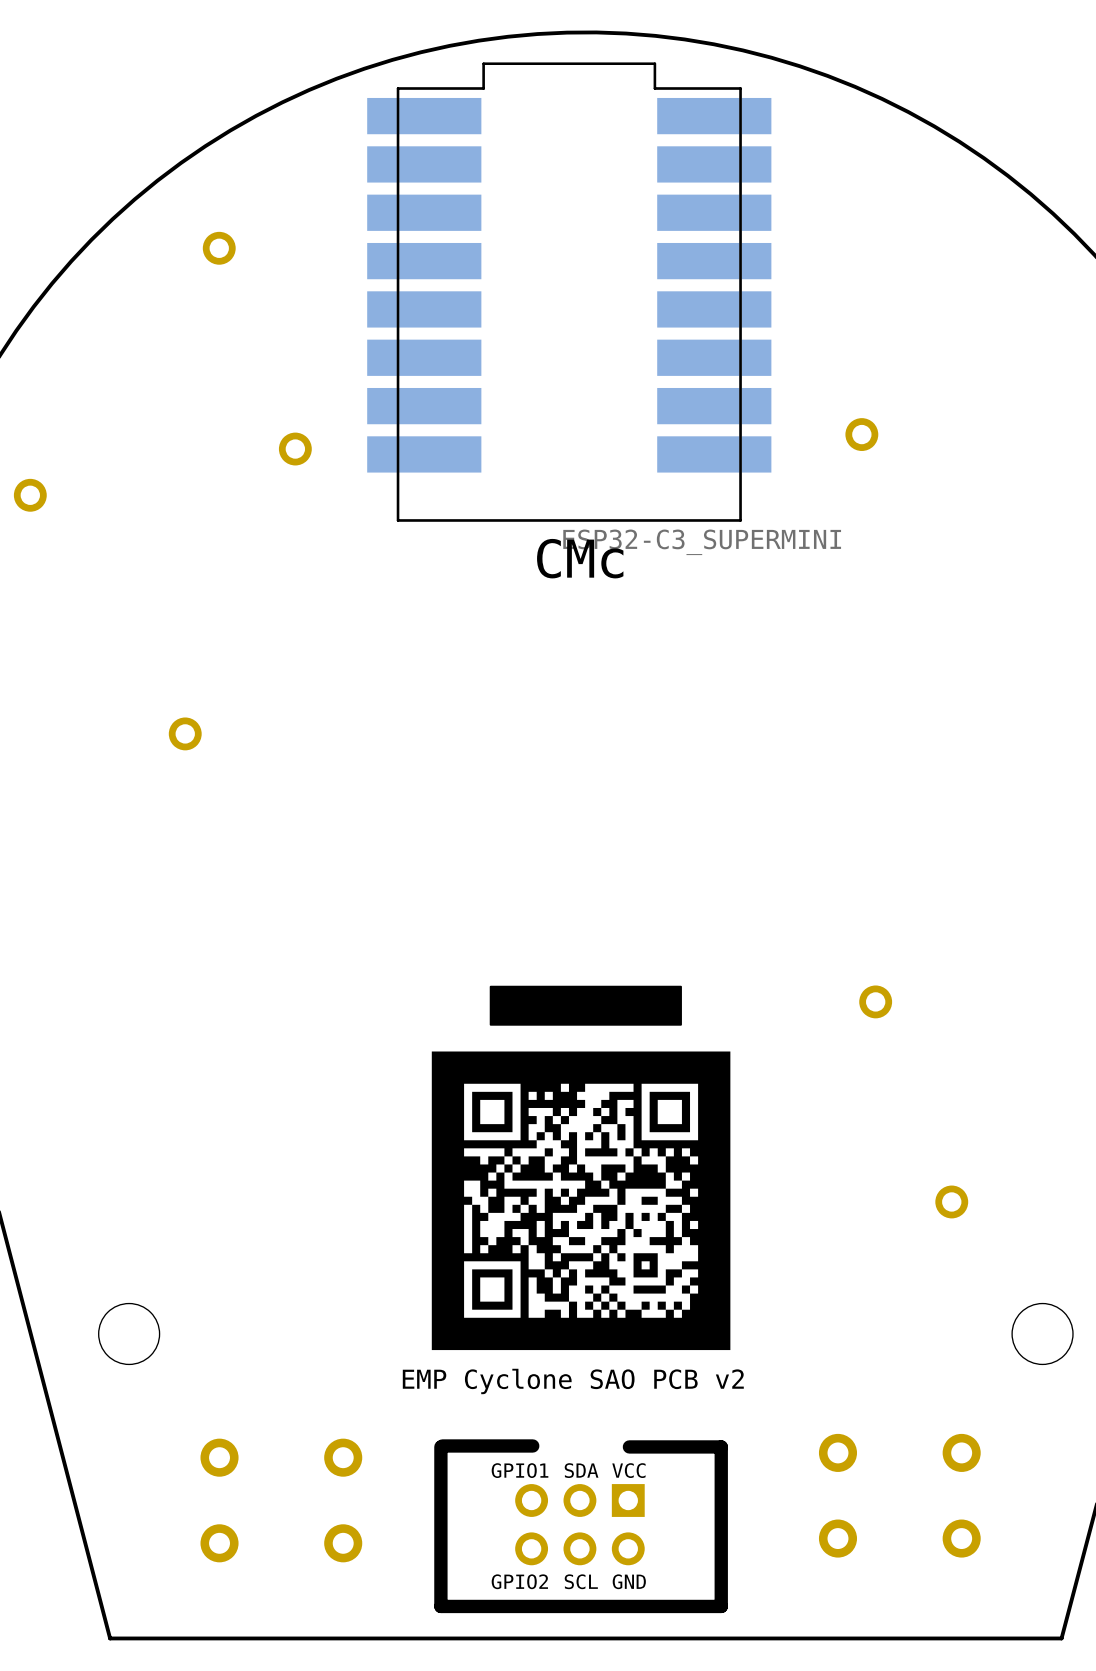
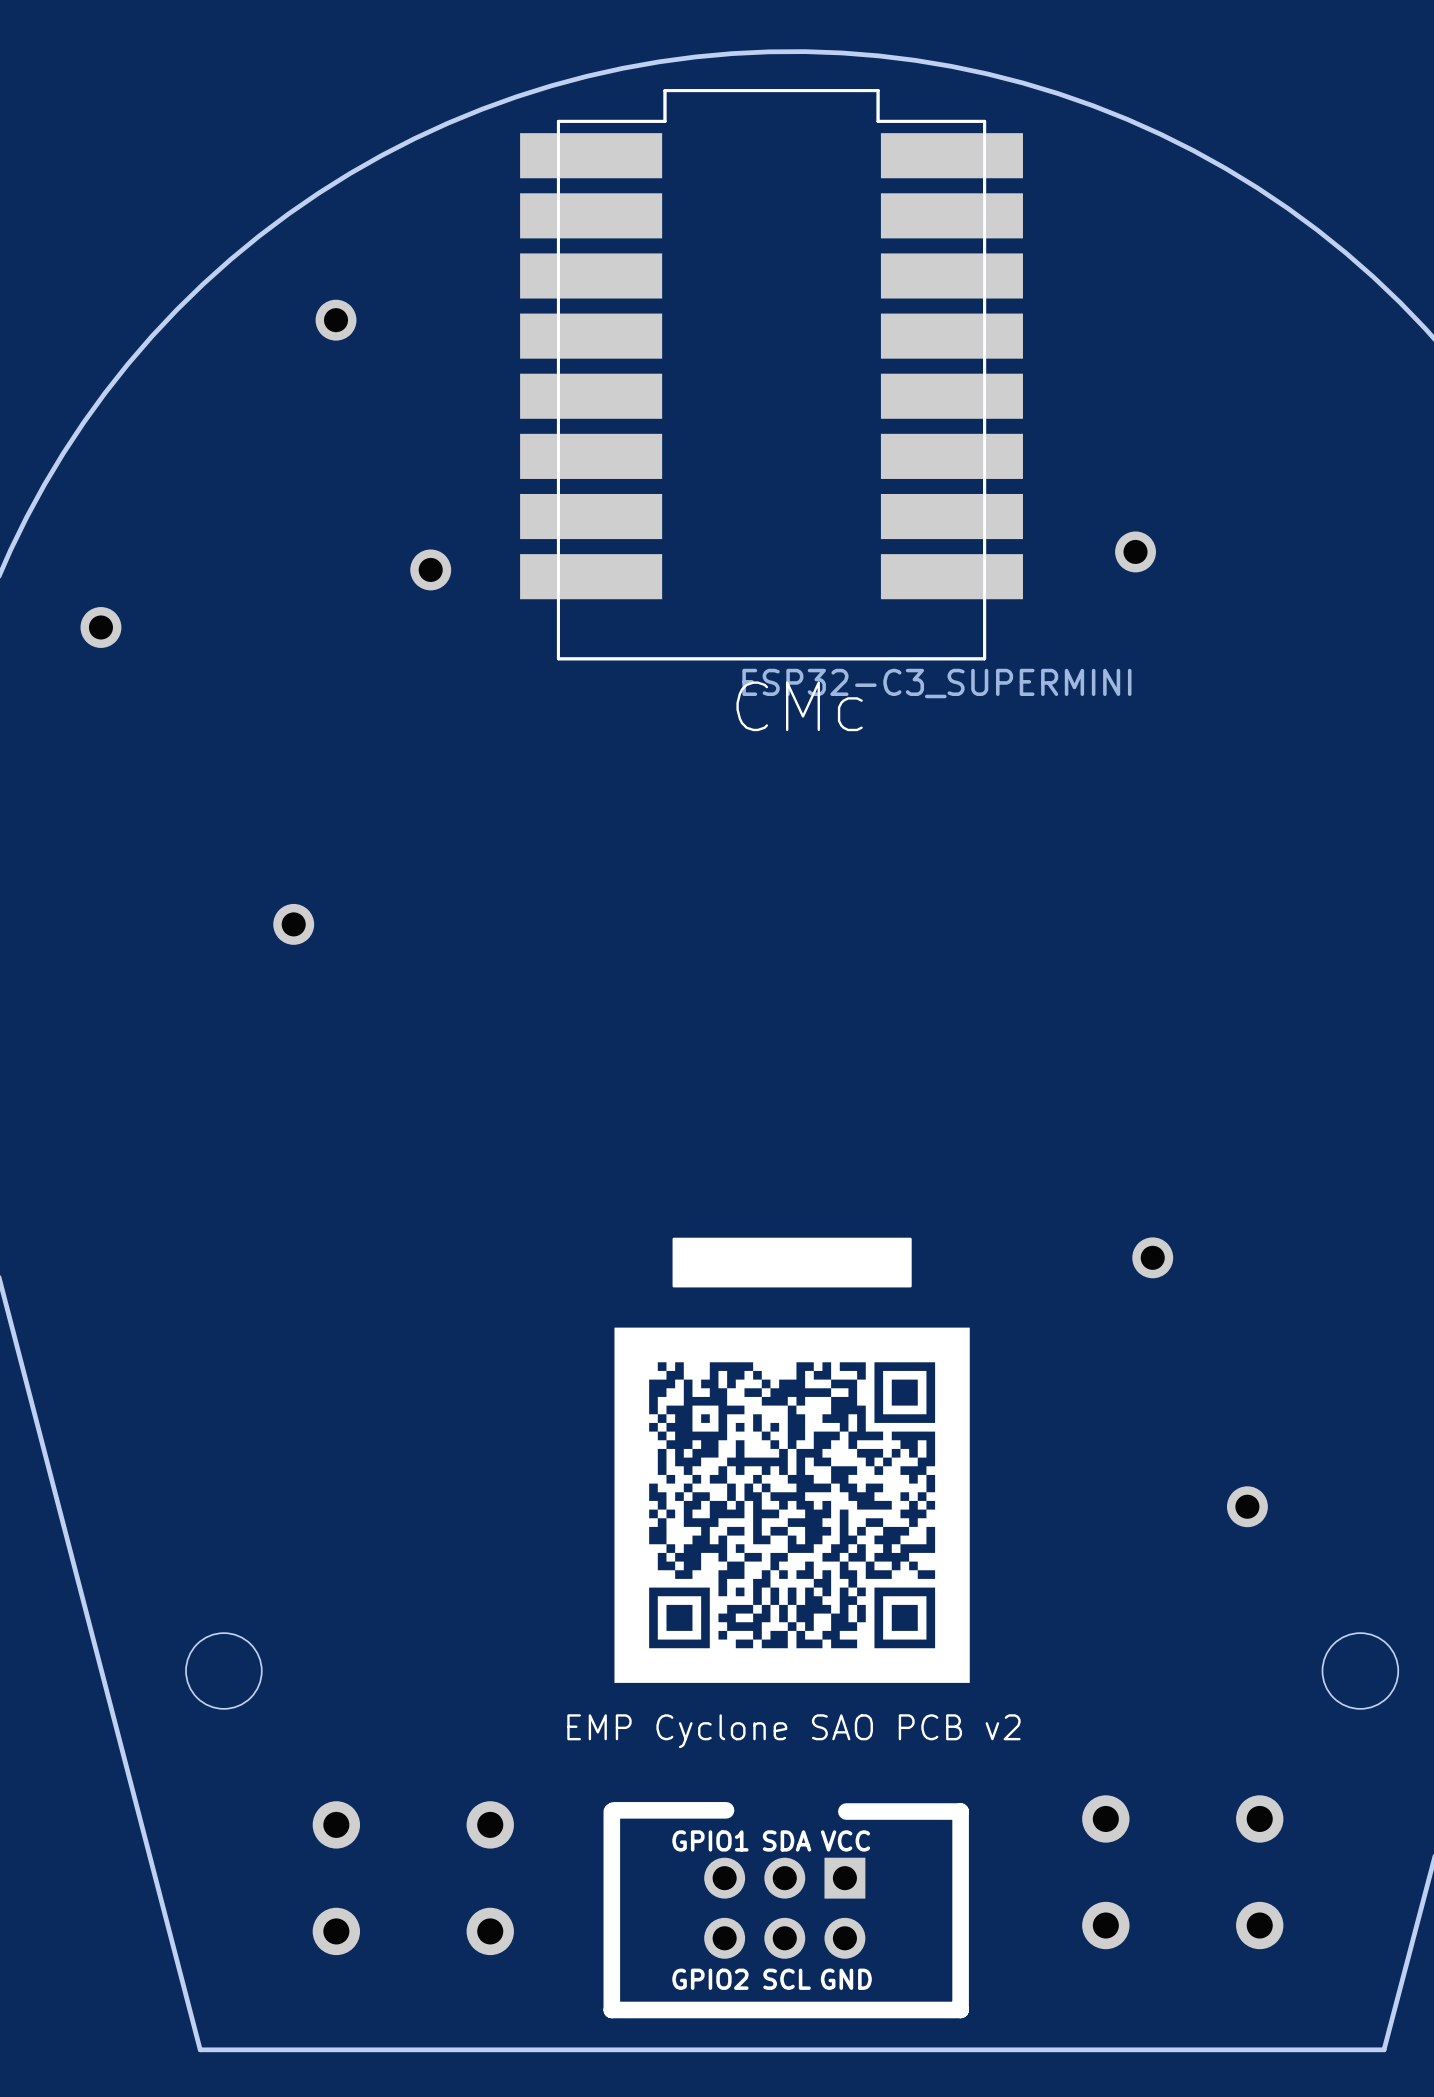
drawing shape: [431, 1051, 731, 1351] -> [614, 1327, 970, 1683]

